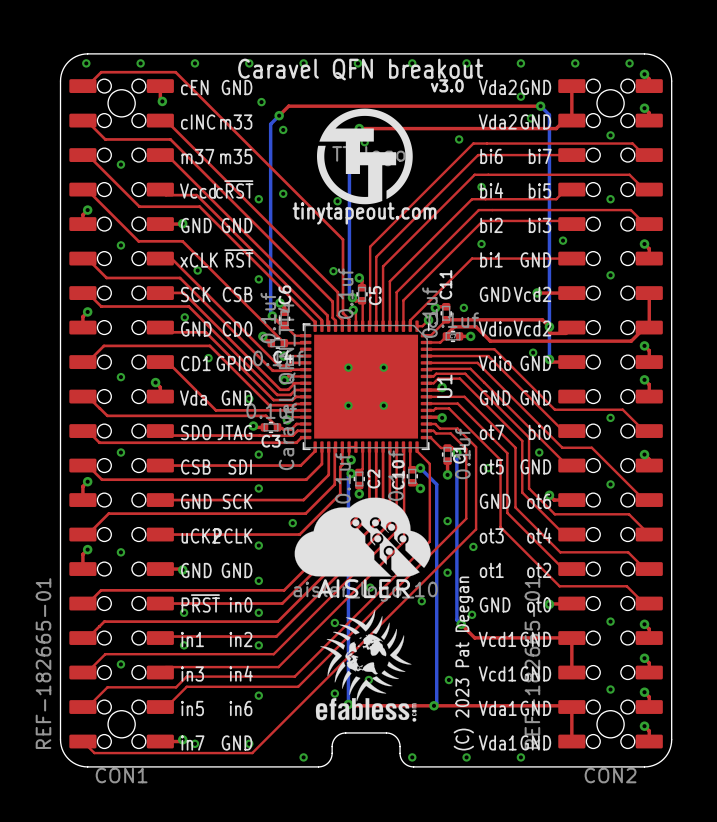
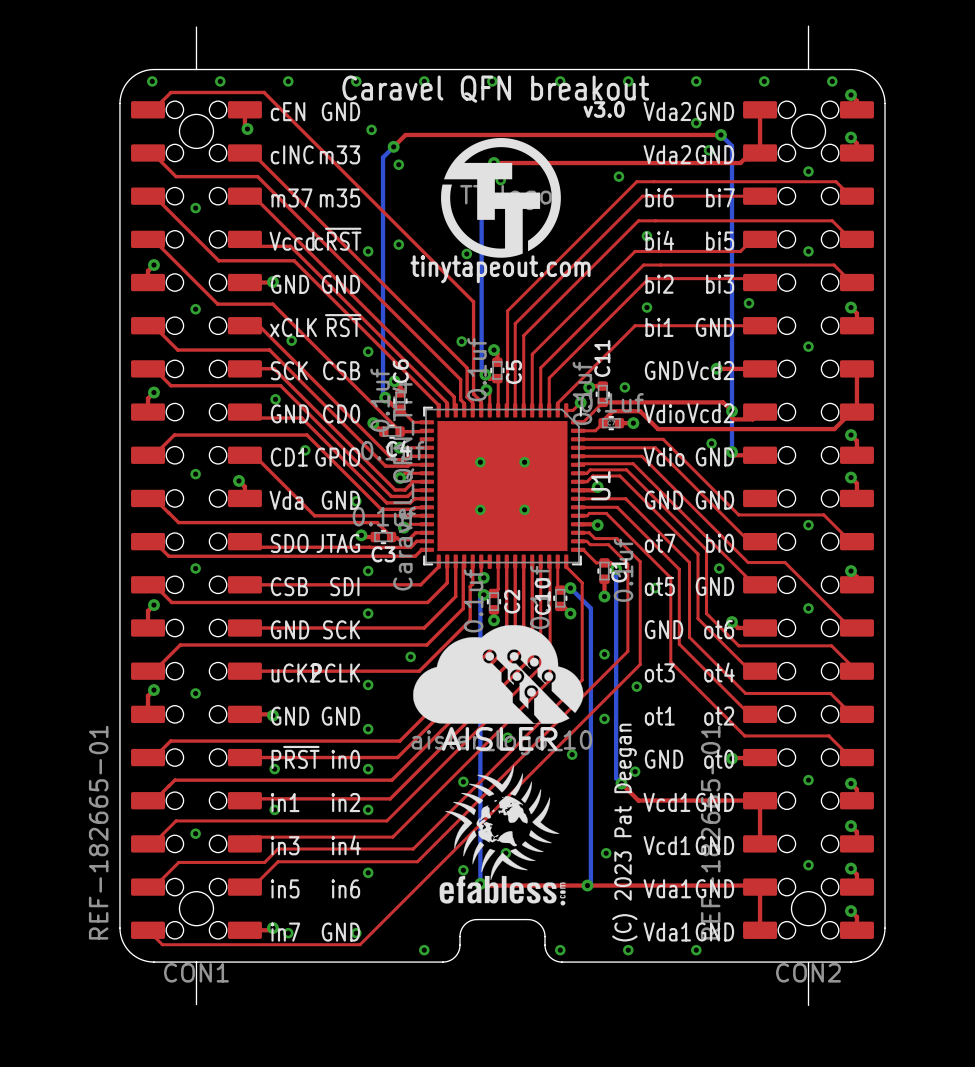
board edge: none -> (196, 27) (196, 69)
board edge: none -> (808, 26) (808, 68)
board edge: none -> (196, 962) (196, 1004)
board edge: none -> (808, 962) (808, 1005)

